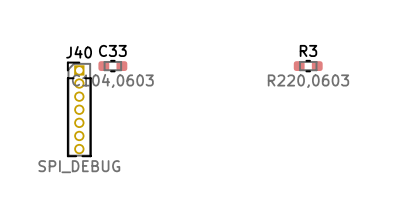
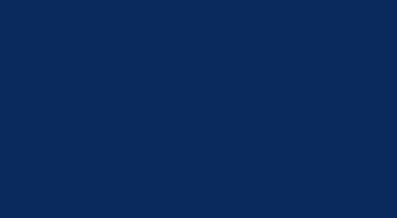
C33: C104,0603 (112, 66) -> none
R3: R220,0603 (308, 66) -> none
J40: SPI_DEBUG (79, 109) -> none

